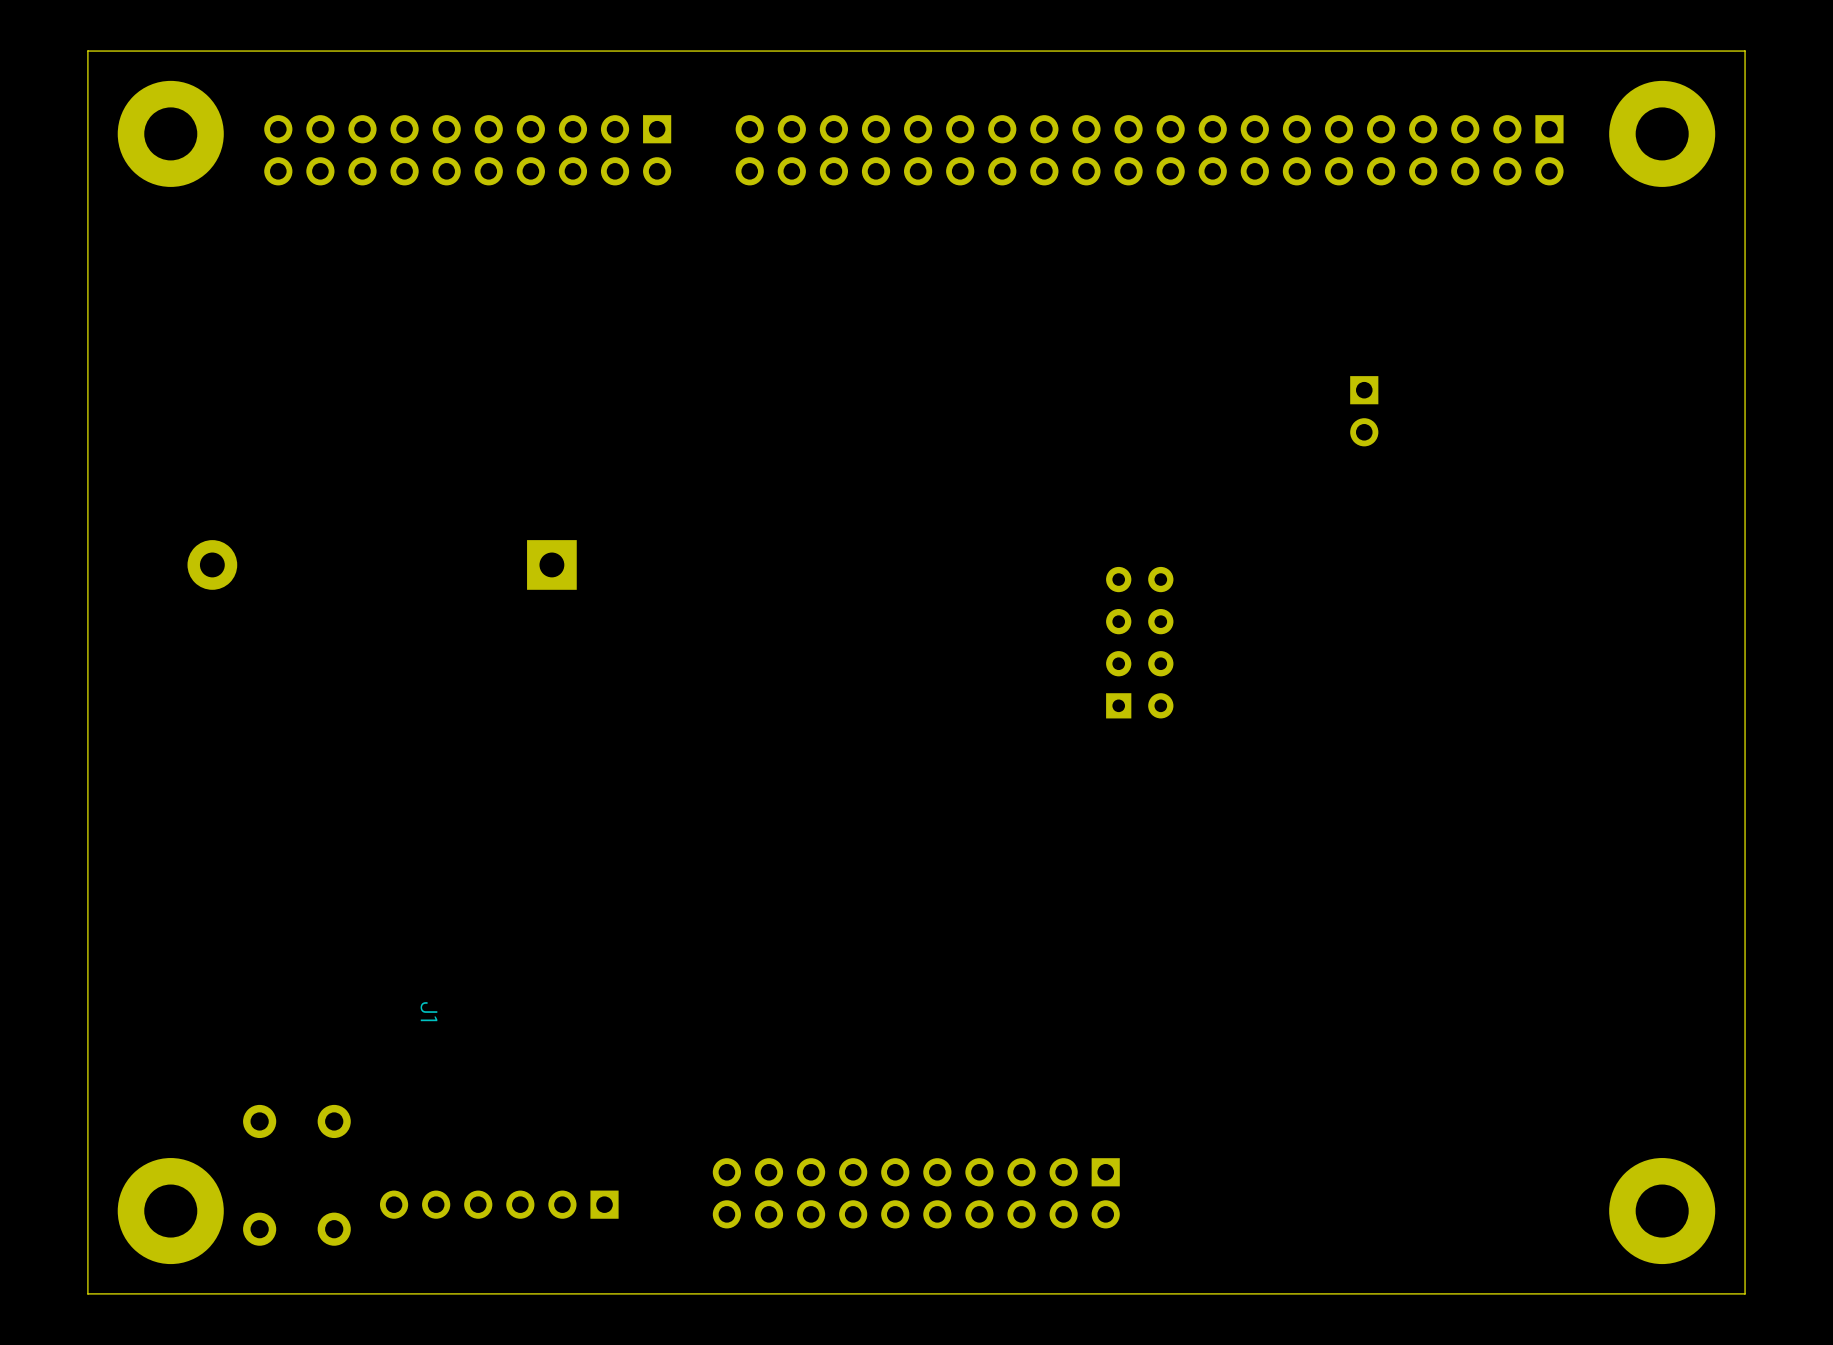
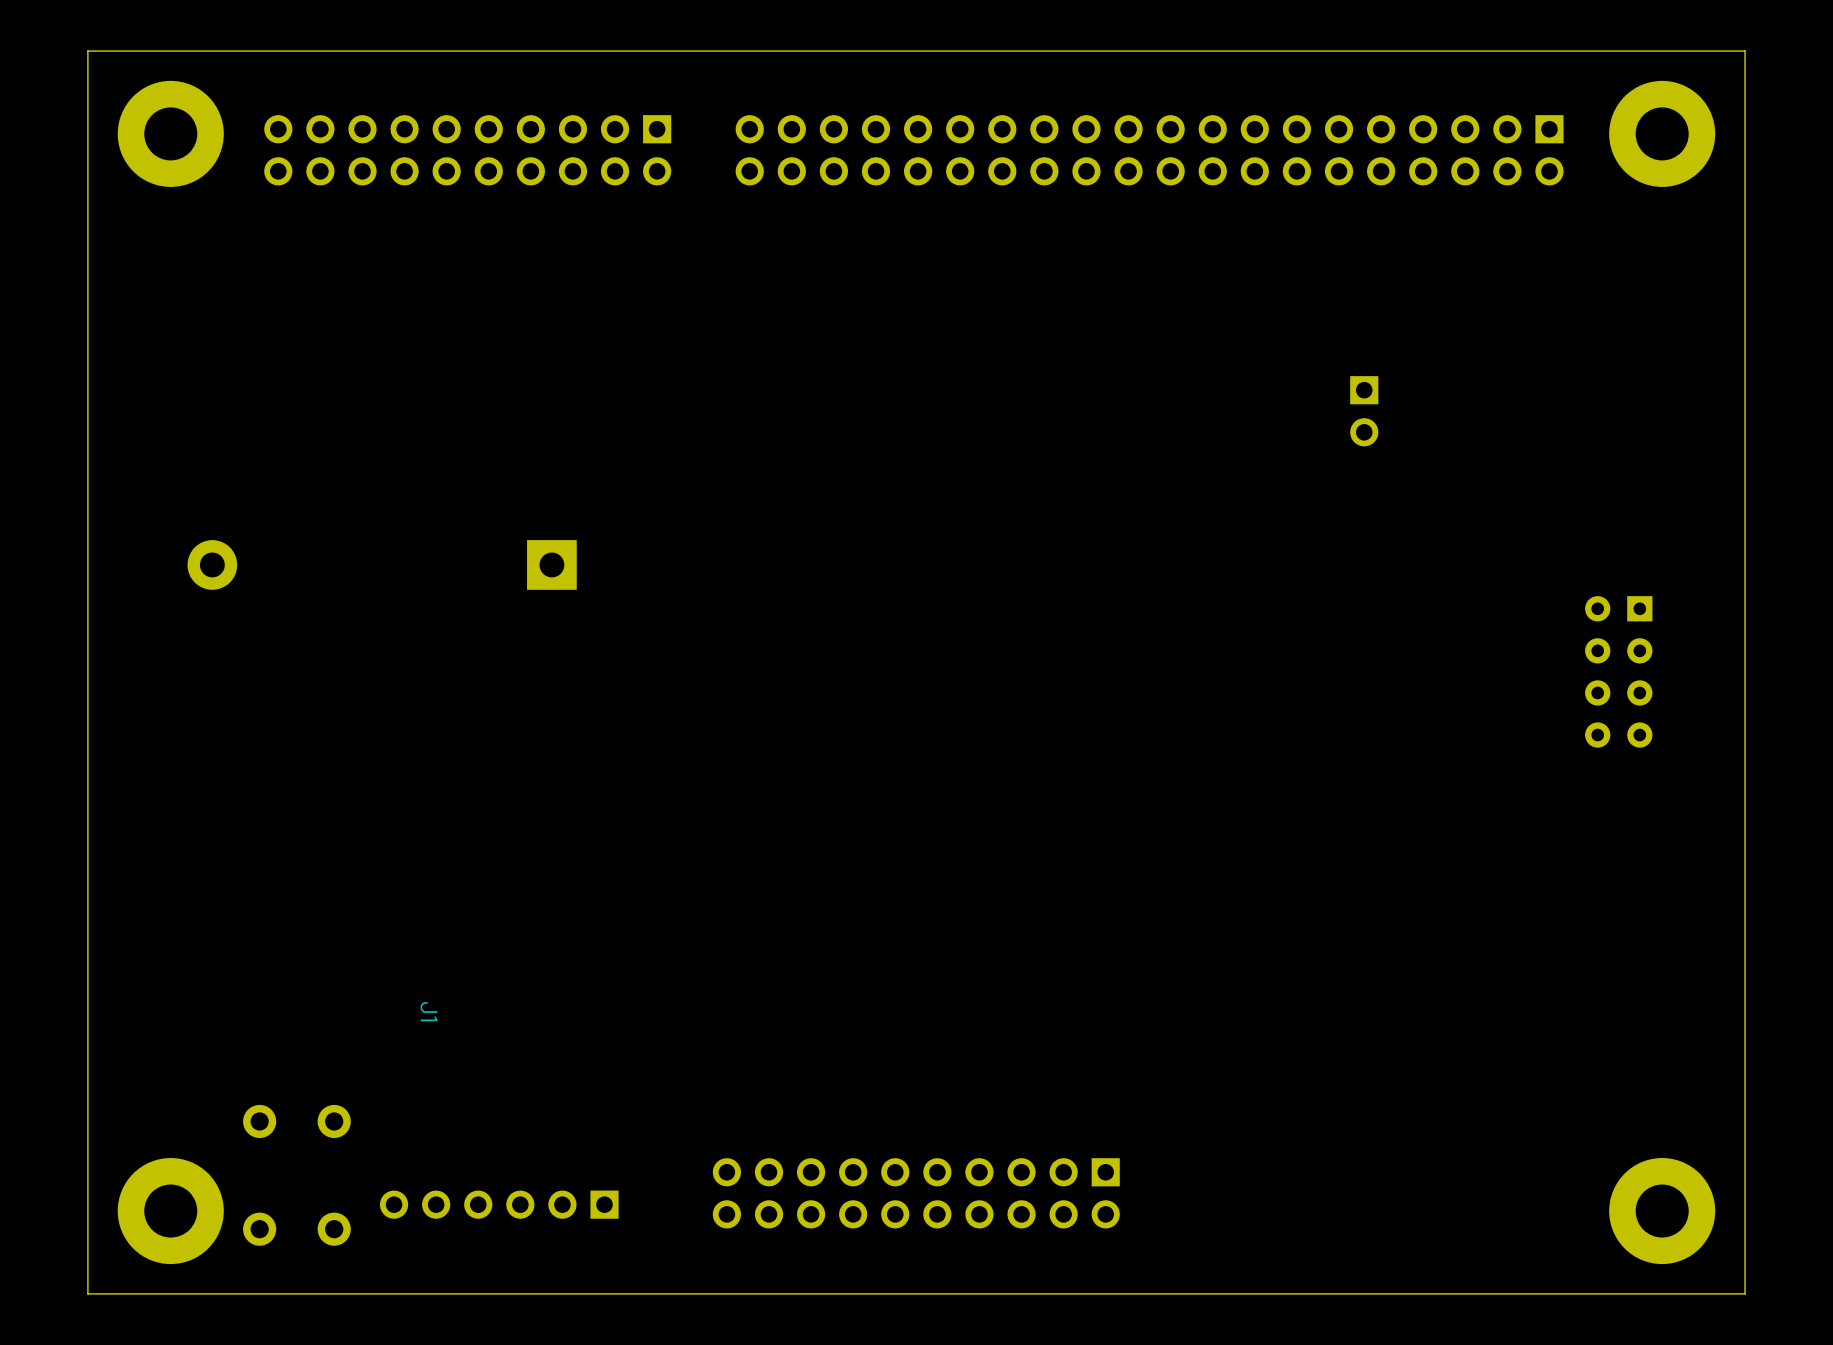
part: (1139, 642) -> none
part: none -> (1618, 671)

